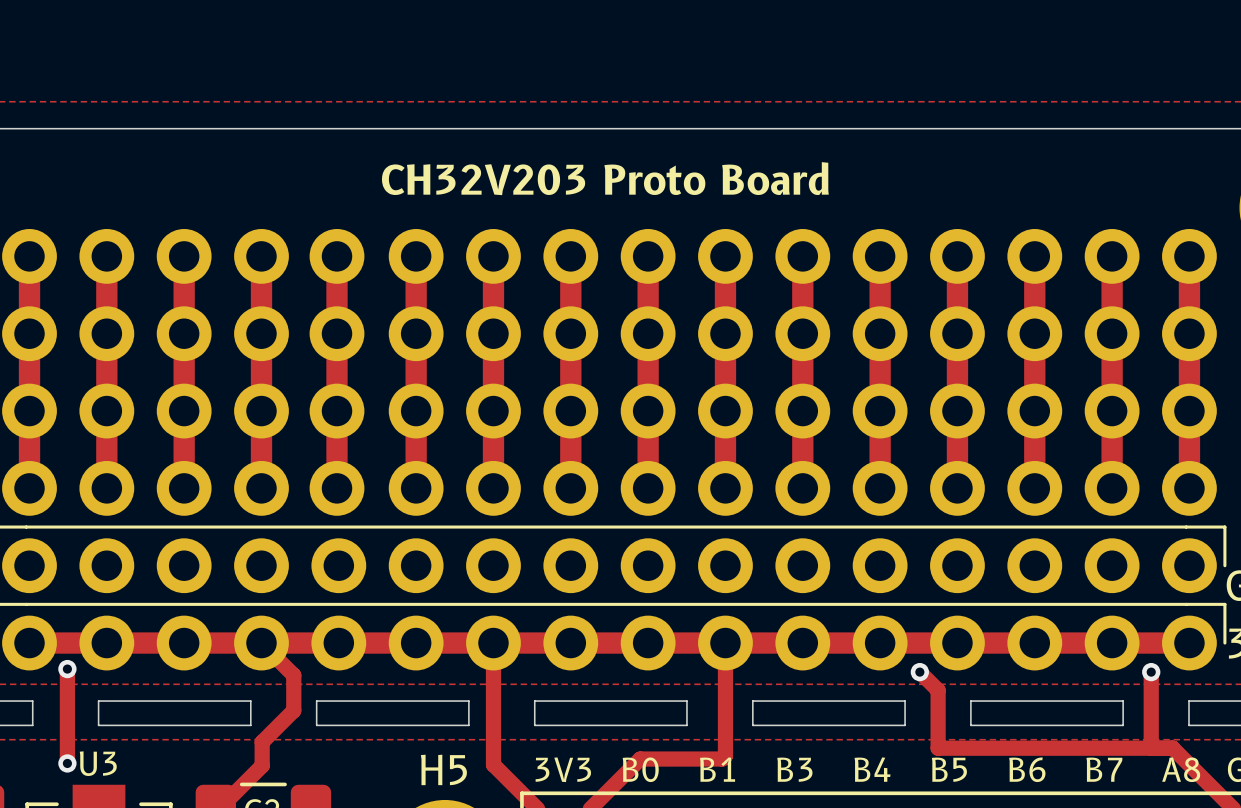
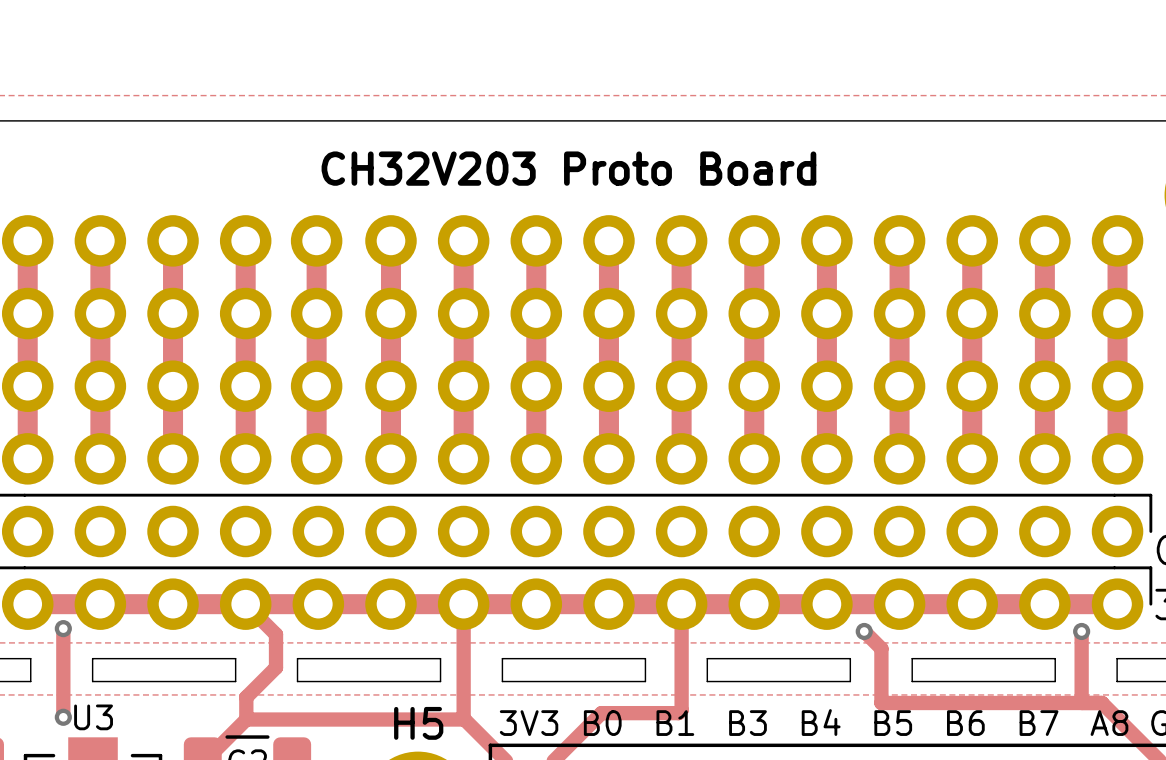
track: none -> (246, 719) (464, 719)

